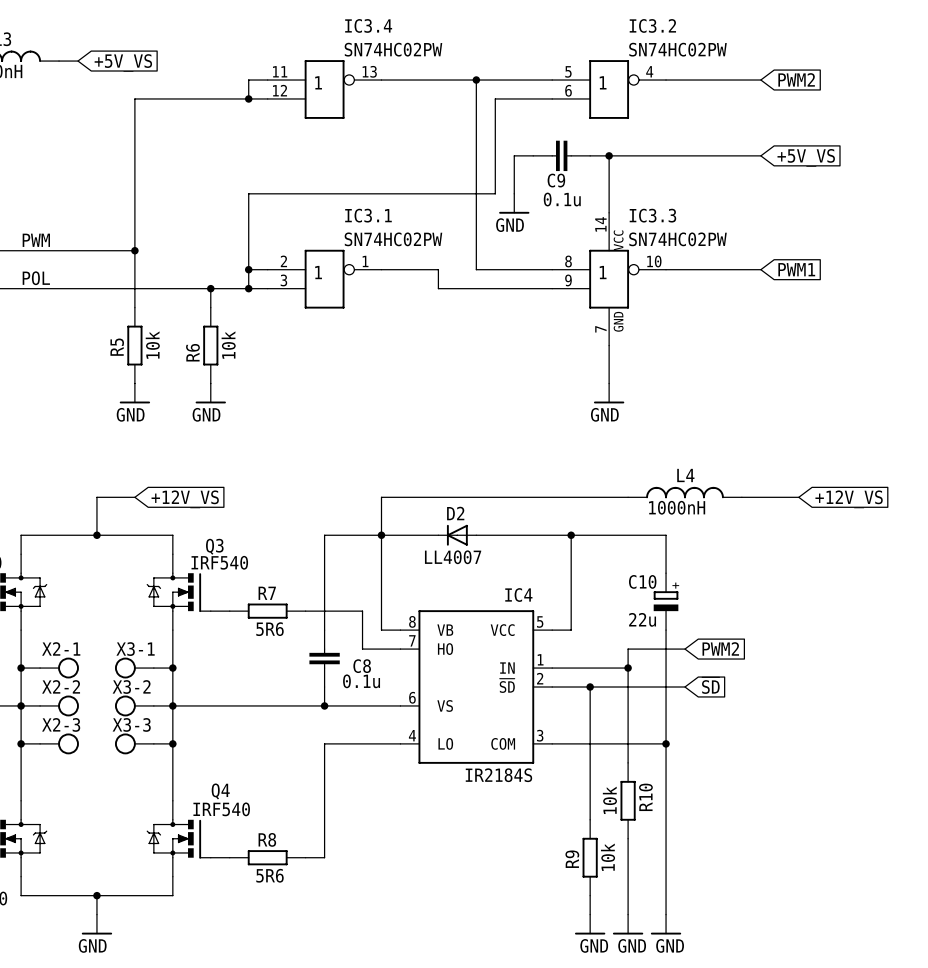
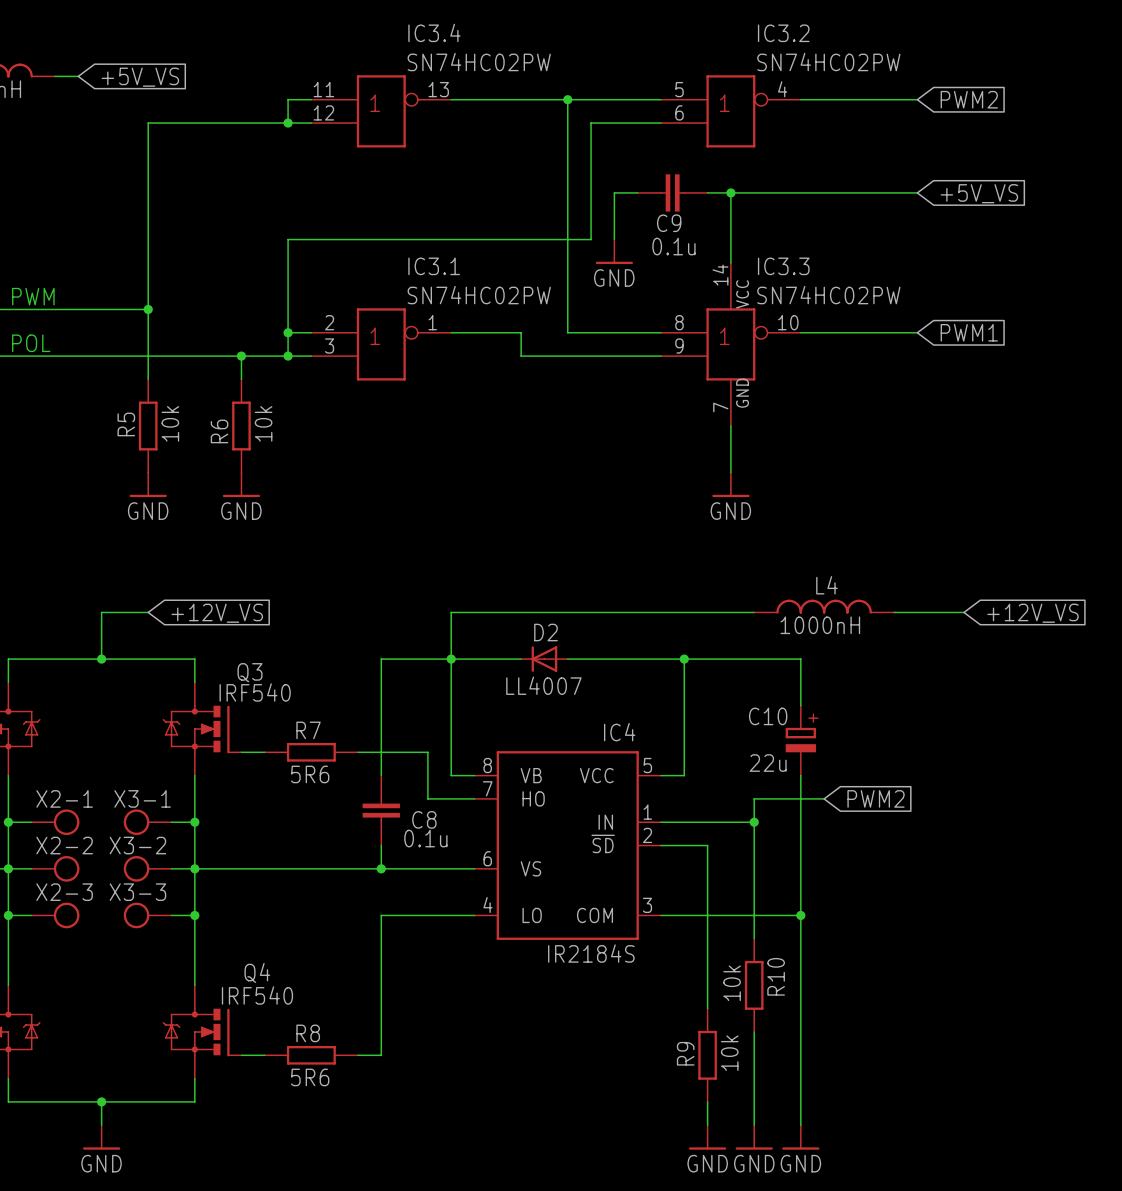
global label: ~{SD} (710, 685) -> none
wire: (590, 687) (684, 687) -> none
junction: (590, 687) -> none

